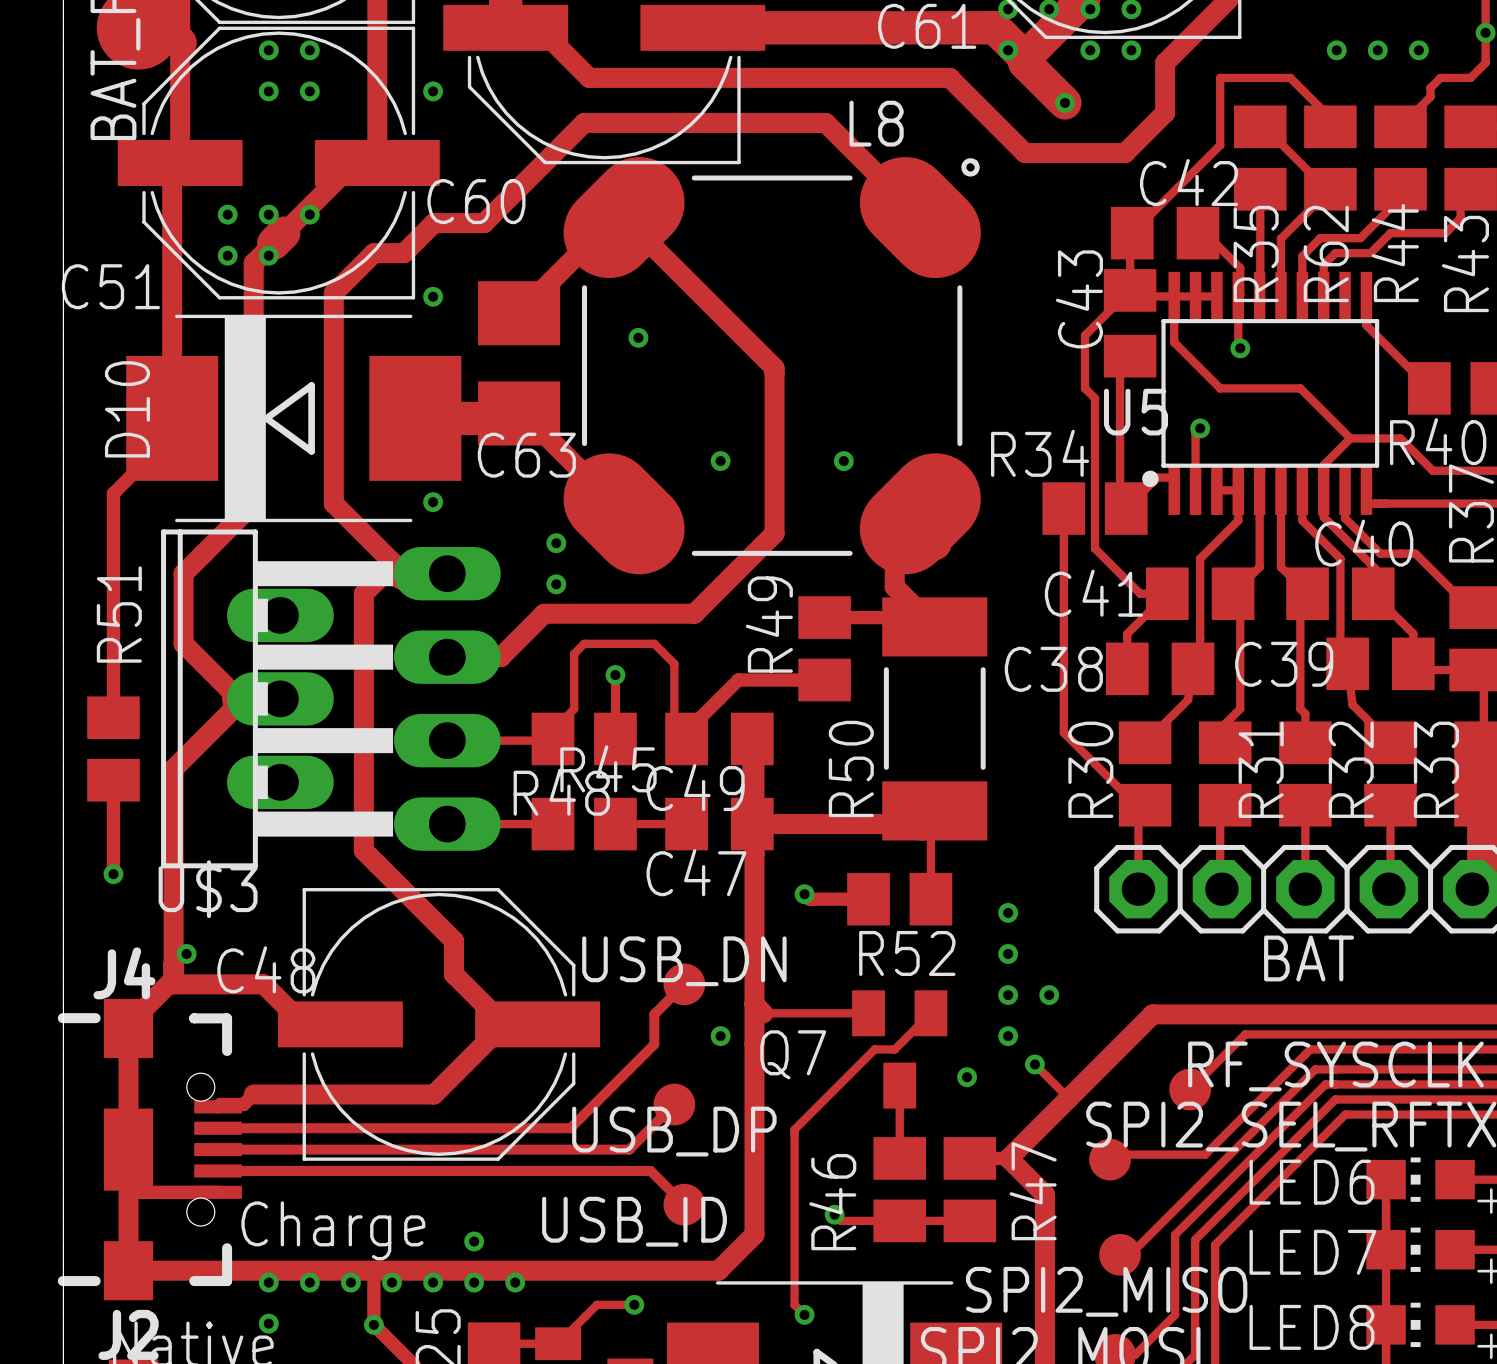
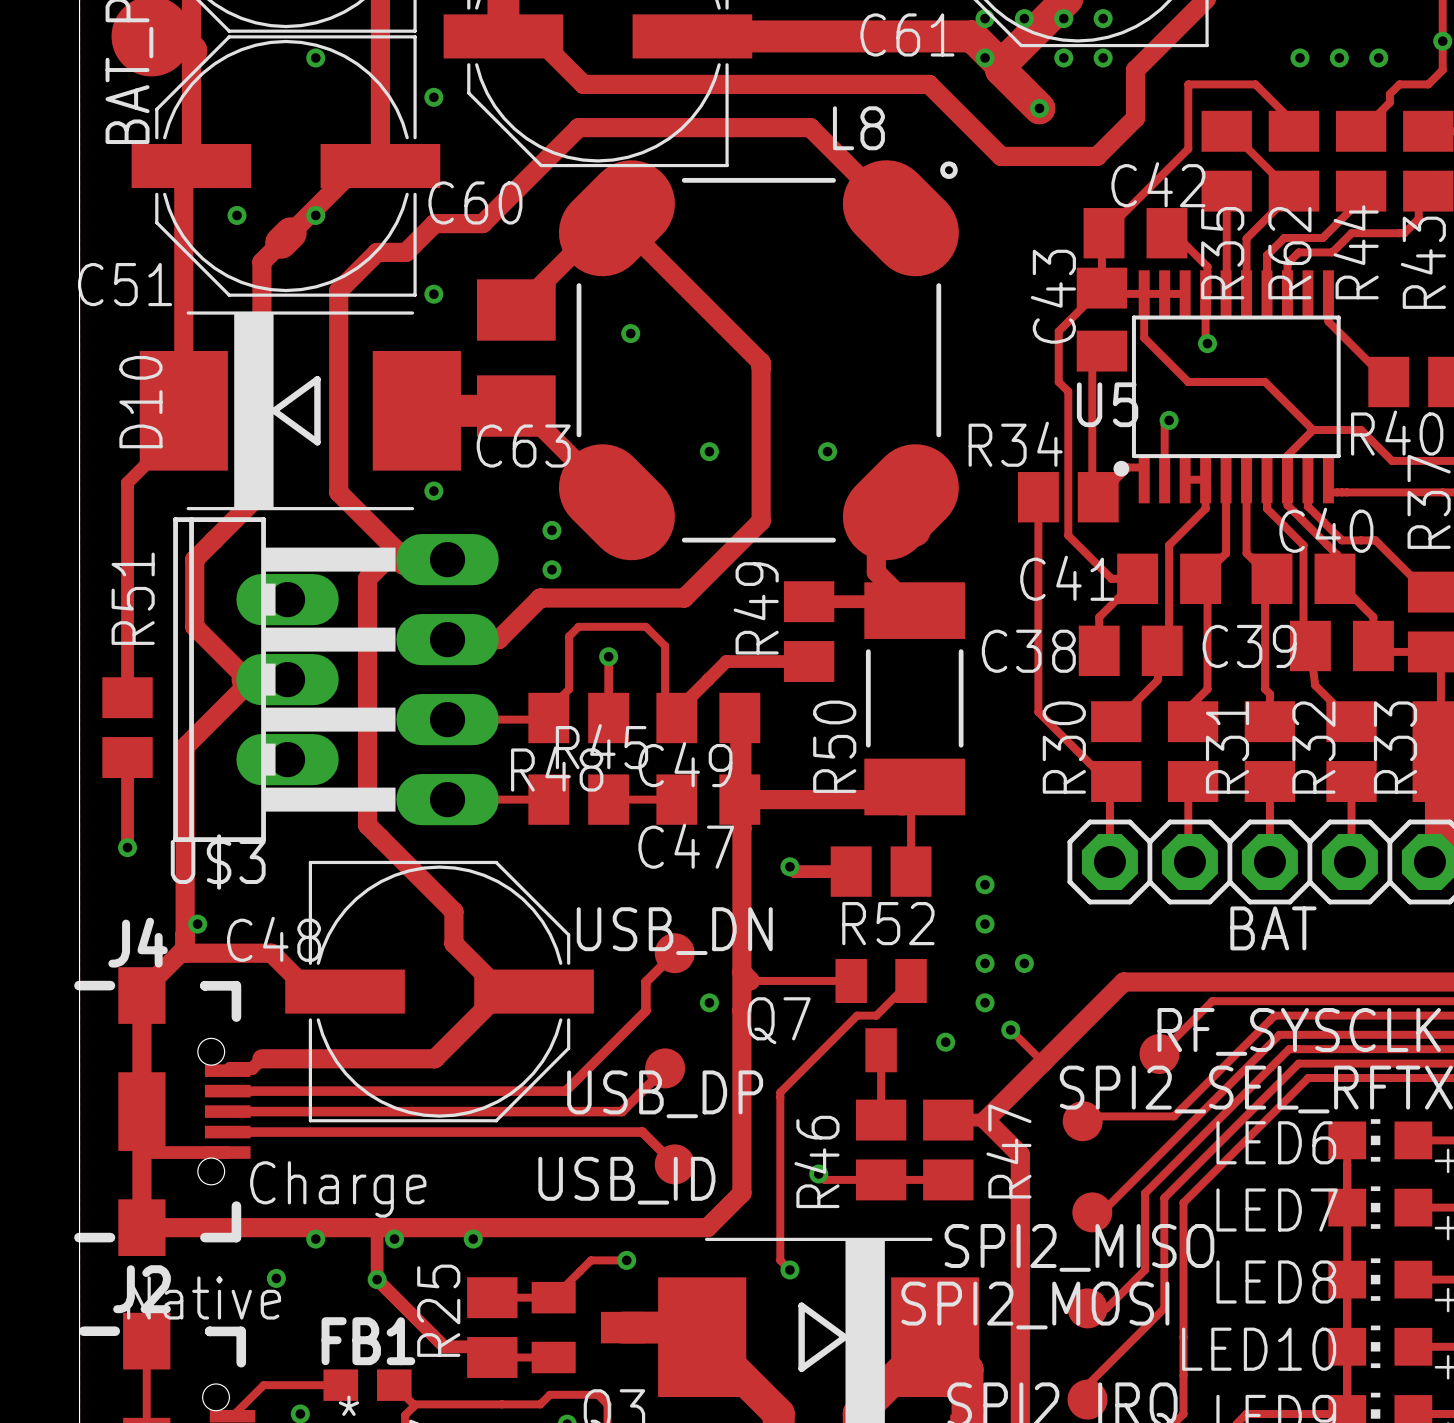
via: (268, 50) -> none
via: (268, 91) -> none
via: (309, 91) -> none
via: (268, 214) -> none
via: (227, 255) -> none
via: (268, 255) -> none
via: (474, 1241) -> none
via: (268, 1282) -> none
via: (350, 1282) -> none
via: (433, 1282) -> none
via: (515, 1282) -> none

